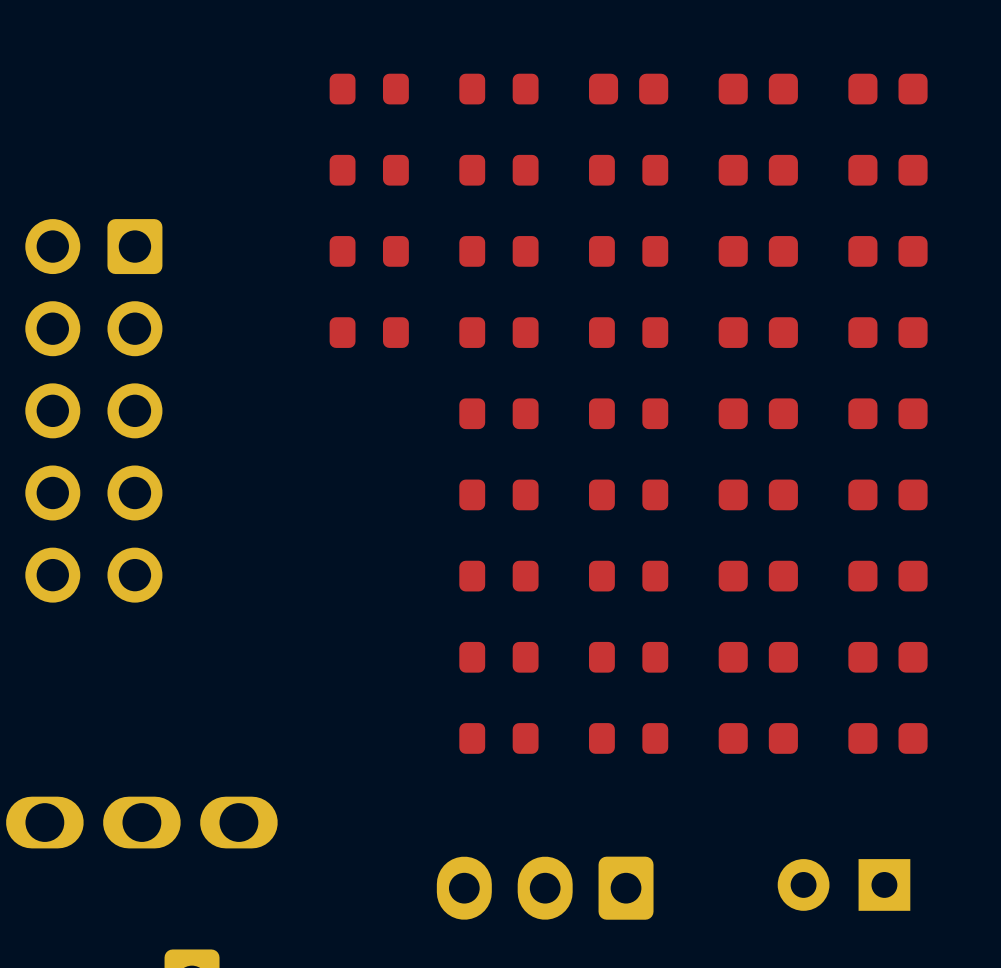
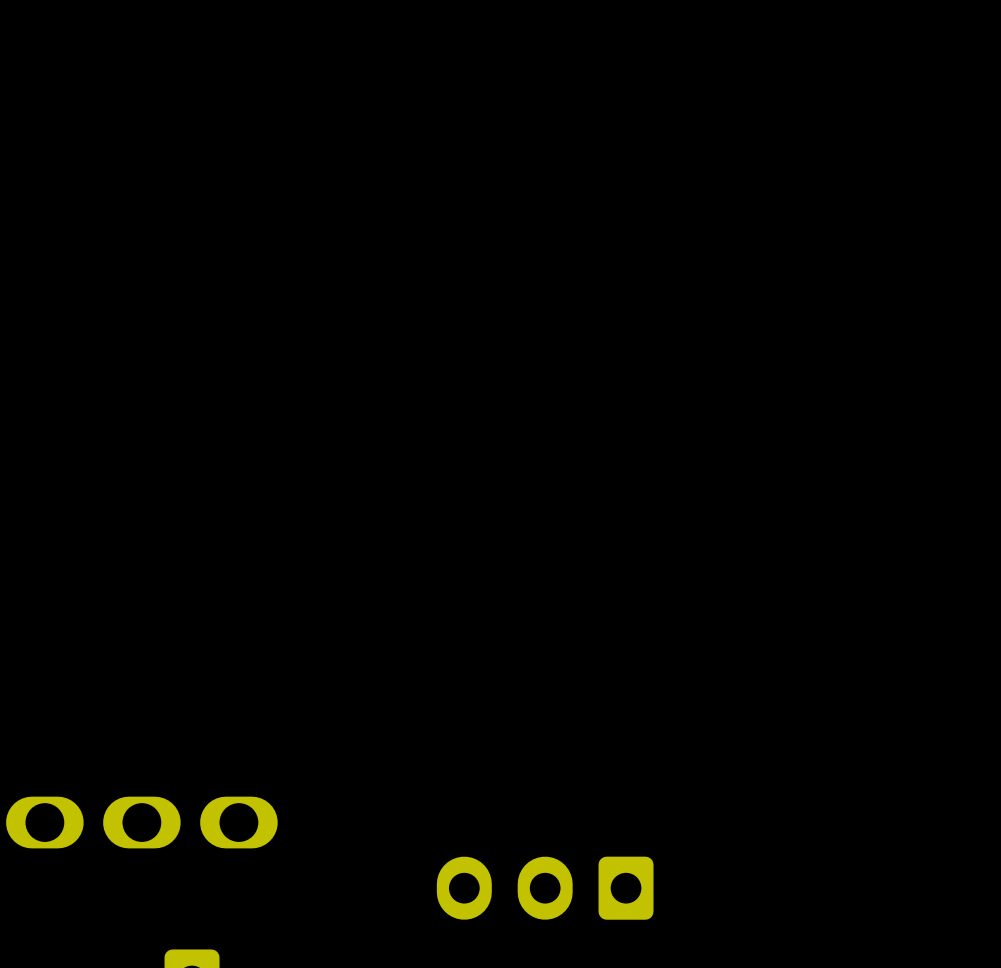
part: (369, 89) -> none
part: (498, 89) -> none
part: (628, 89) -> none
part: (758, 89) -> none
part: (887, 89) -> none
part: (369, 170) -> none
part: (498, 170) -> none
part: (628, 170) -> none
part: (758, 170) -> none
part: (887, 170) -> none
part: (369, 251) -> none
part: (498, 251) -> none
part: (628, 251) -> none
part: (758, 251) -> none
part: (887, 251) -> none
part: (369, 332) -> none
part: (498, 332) -> none
part: (628, 332) -> none
part: (758, 332) -> none
part: (887, 332) -> none
part: (93, 410) -> none
part: (498, 413) -> none
part: (628, 413) -> none
part: (758, 413) -> none
part: (887, 413) -> none
part: (498, 494) -> none
part: (628, 494) -> none
part: (758, 494) -> none
part: (887, 494) -> none
part: (498, 576) -> none
part: (628, 576) -> none
part: (758, 576) -> none
part: (887, 576) -> none
part: (498, 657) -> none
part: (628, 657) -> none
part: (758, 657) -> none
part: (887, 657) -> none
part: (498, 738) -> none
part: (628, 738) -> none
part: (758, 738) -> none
part: (887, 738) -> none
part: (844, 884) -> none

